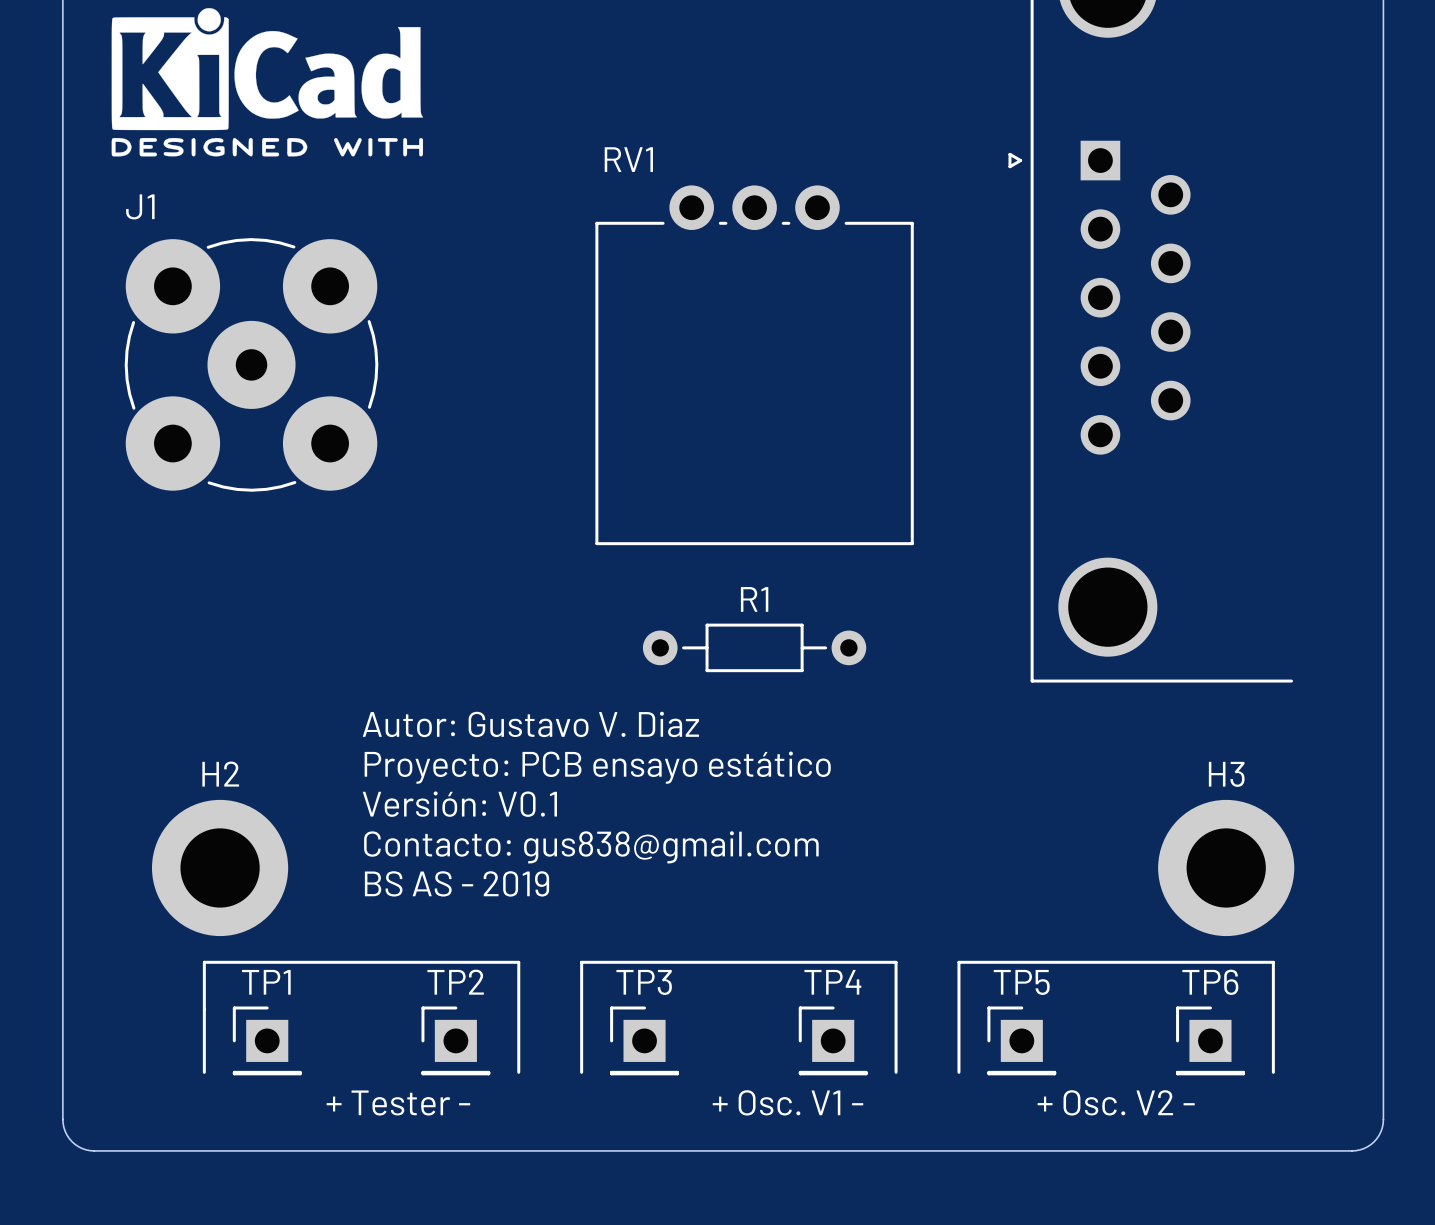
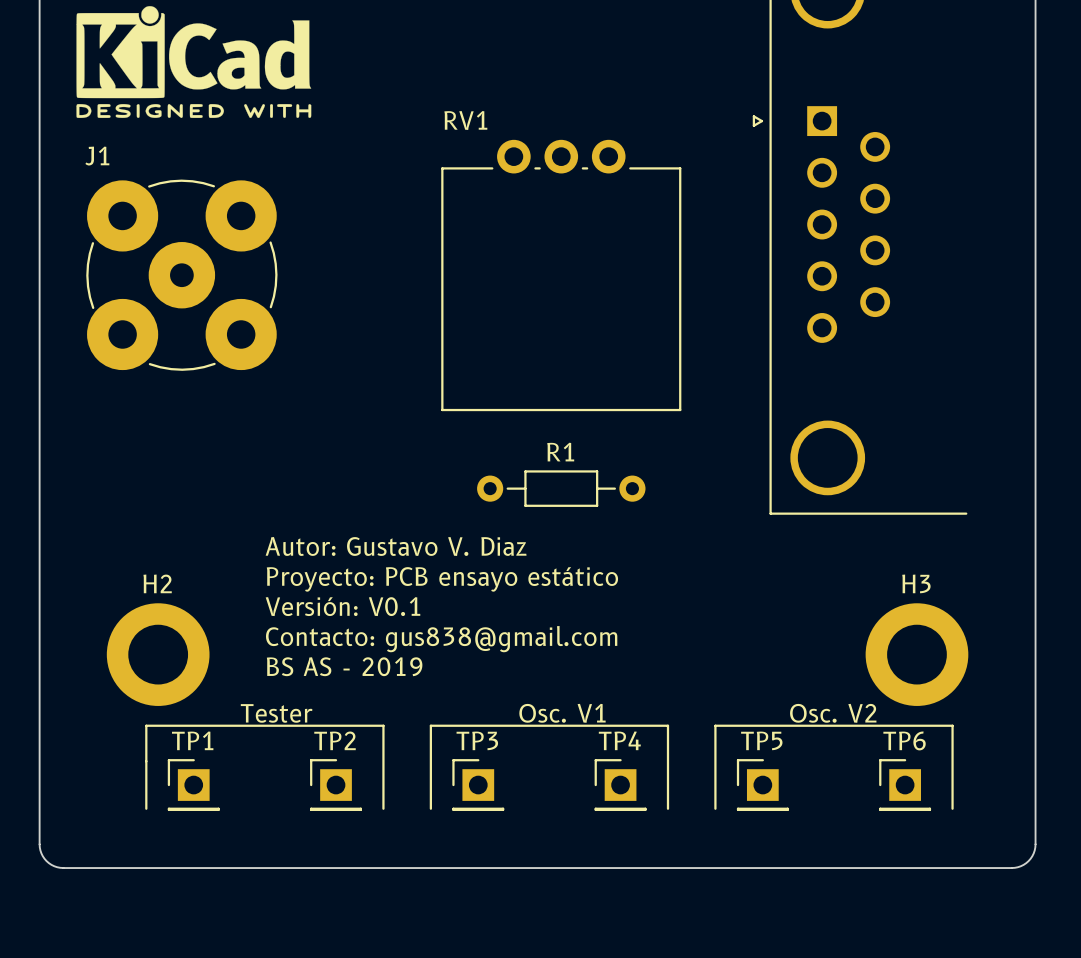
text: none -> Tester (276, 713)
text: none -> Osc. V1 (562, 713)
text: none -> Osc. V2 (833, 713)
text: + Osc. V1 - (787, 1102) -> none
text: + Osc. V2 - (1116, 1102) -> none
text: + Tester - (398, 1103) -> none

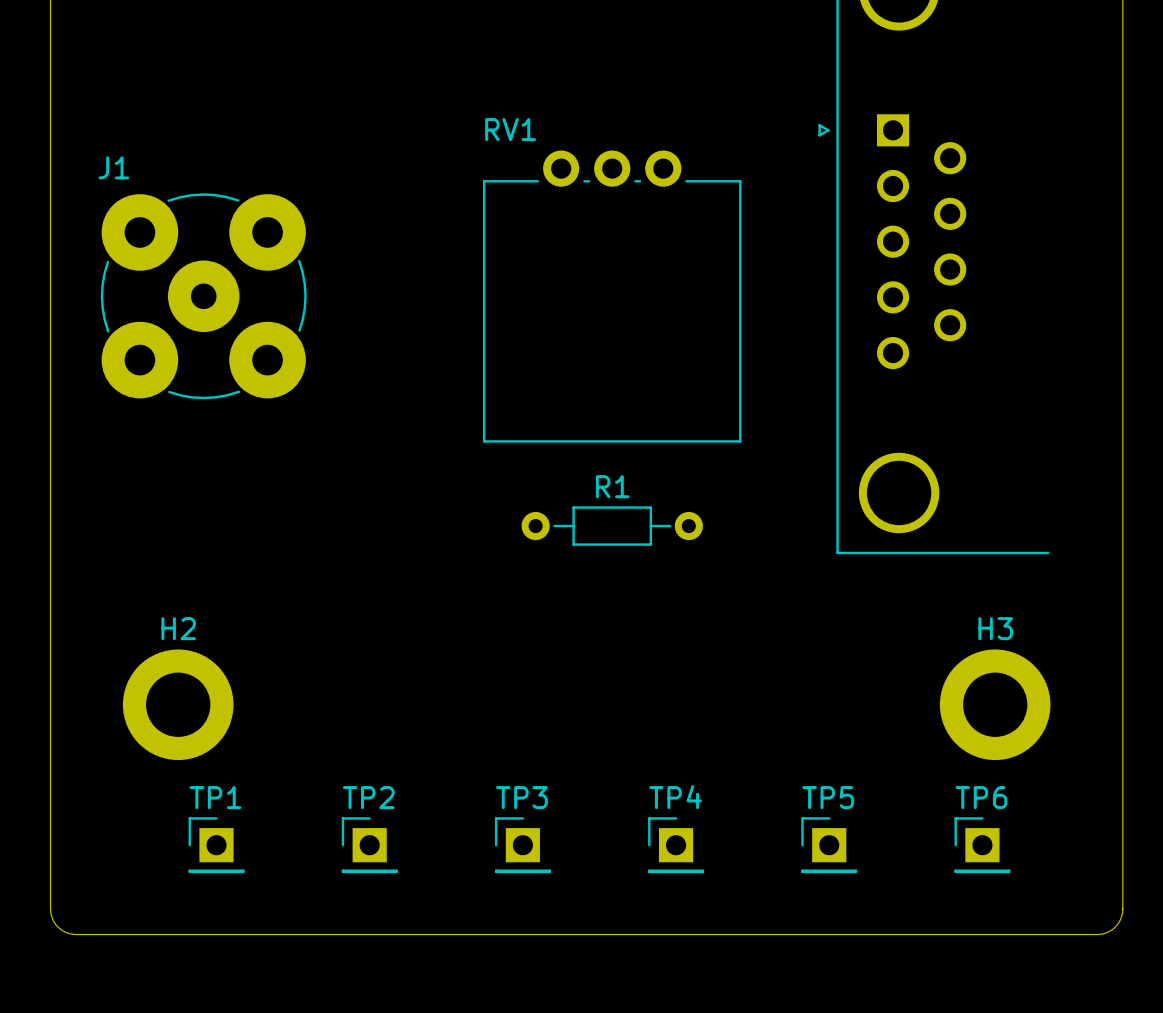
drawing: [76, 6, 312, 118] -> none
text: Autor: Gustavo V. Diaz (396, 546) -> none
text: Proyecto: PCB ensayo estático (442, 579) -> none
text: Versión: V0.1 (342, 606) -> none
text: Contacto: gus838@gmail.com (441, 639) -> none
text: BS AS - 2019 (344, 666) -> none
text: Tester (276, 713) -> none
text: Osc. V1 (562, 713) -> none
text: Osc. V2 (833, 713) -> none
line: (146, 808) (146, 725) (383, 725) (383, 808) -> none
line: (430, 808) (430, 725) (667, 725) (667, 808) -> none
line: (715, 808) (715, 725) (952, 725) (952, 808) -> none

